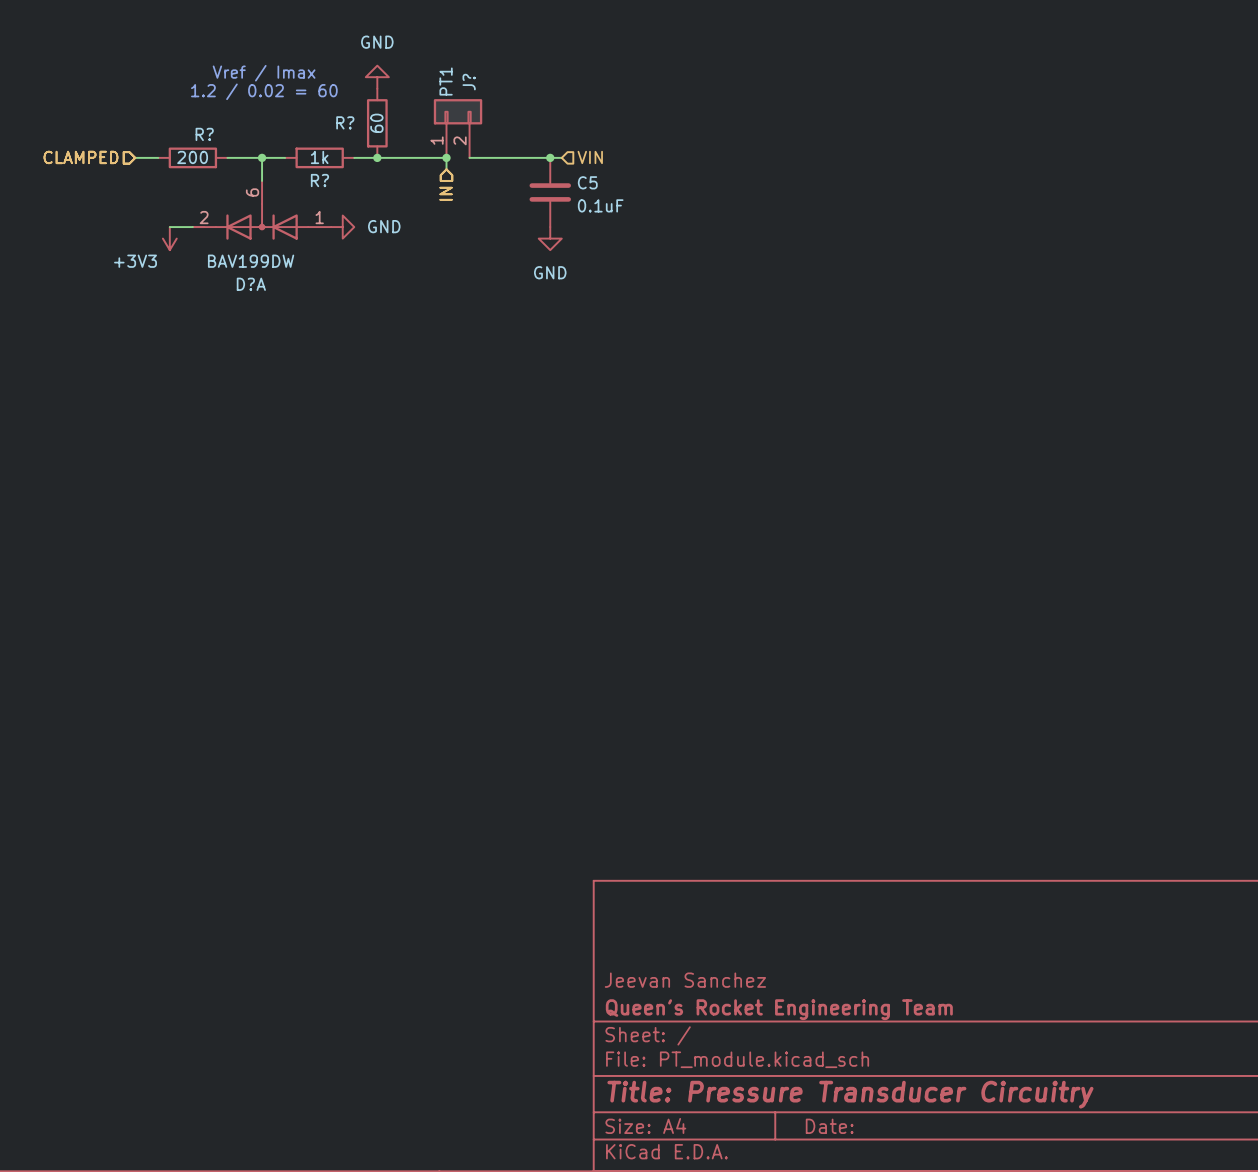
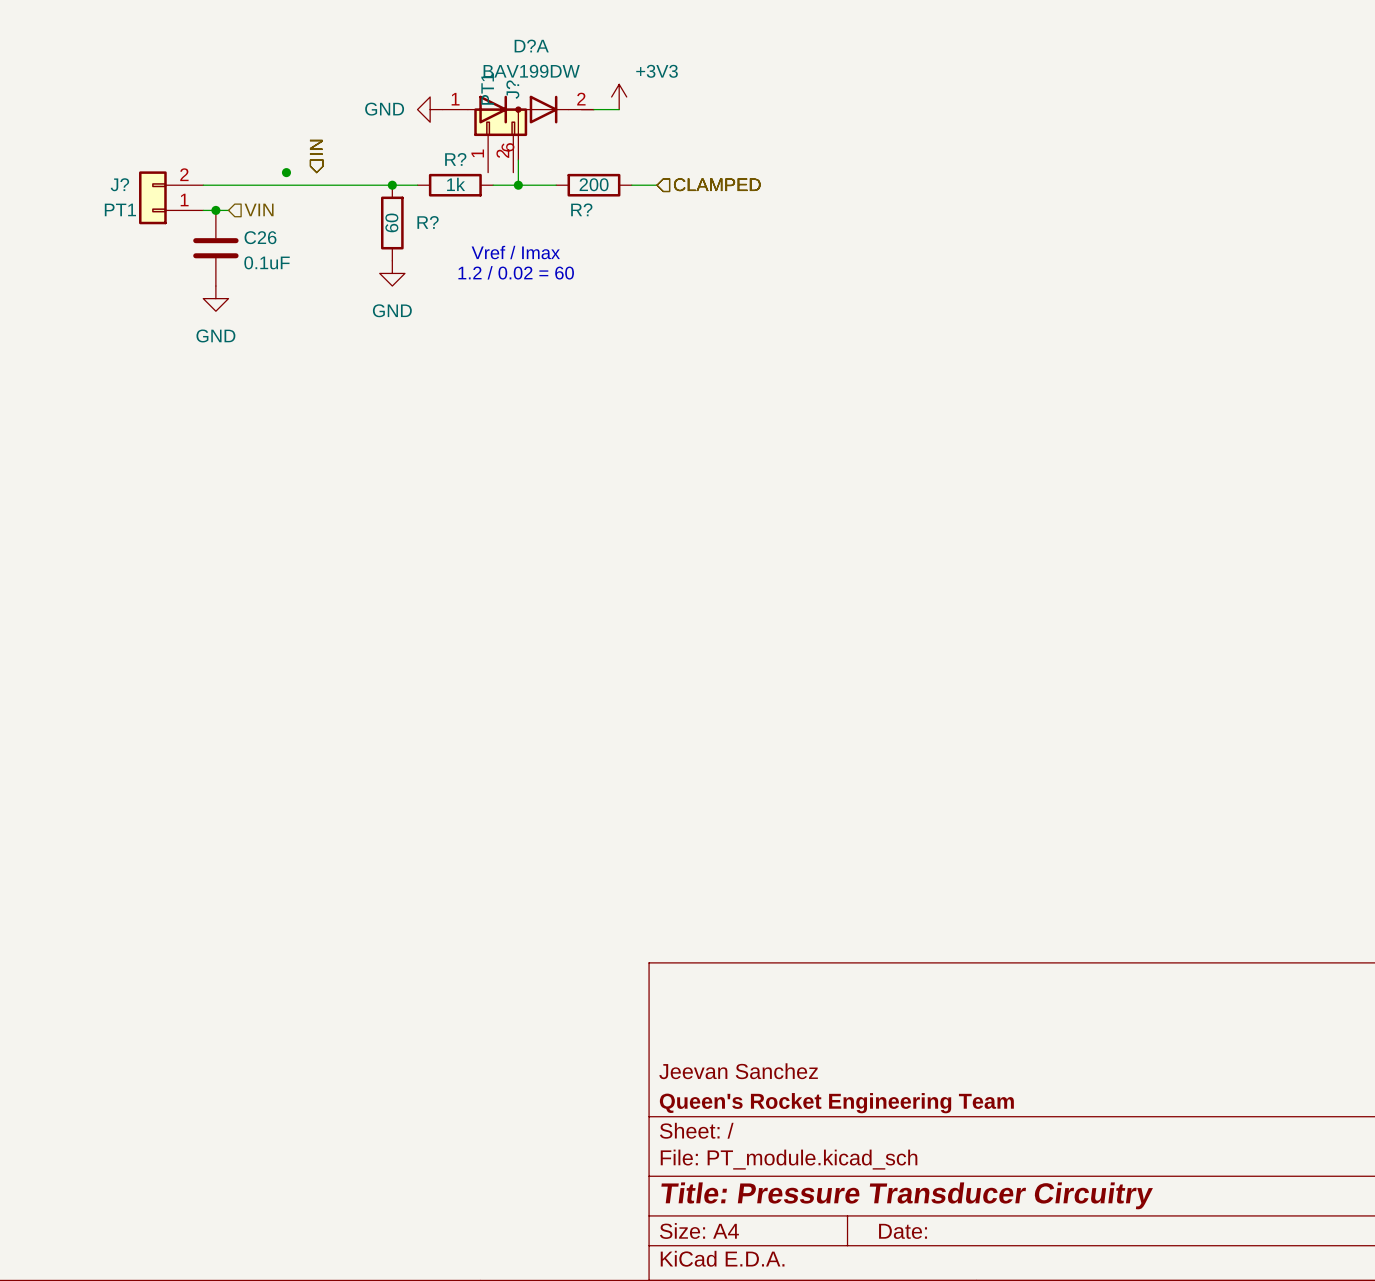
text: Vref / Imax (264, 73) -> none
power symbol rotation: 0° (377, 77) -> 90° counterclockwise (430, 109)
power symbol position: GND (377, 77) -> GND (430, 109)
power symbol: none -> +3V3 (619, 96)
text: 1.2 / 0.02 = 60 (264, 91) -> none
wire: none -> (593, 109) (619, 109)
D?A: none -> BAV199DW (518, 127)
R? name position: R? (345, 122) -> R? (428, 222)
R? position: (377, 123) -> (392, 223)
hierarchical label: CLAMPED (80, 157) -> none
R?: 200 (192, 157) -> none
wire: (227, 157) (285, 157) -> (493, 185) (556, 185)
wire: (262, 157) (262, 180) -> (518, 160) (518, 185)
R? position: (319, 157) -> (455, 185)
wire: (354, 157) (446, 157) (446, 169) -> none
junction position: (377, 157) -> (392, 185)
junction position: (446, 157) -> (518, 185)
wire: (469, 157) (561, 157) -> none
junction: (550, 157) -> none
hierarchical label: VIN (590, 157) -> none
hierarchical label: none -> CLAMPED (717, 184)
wire: none -> (203, 185) (417, 185)
R?: none -> 200 (593, 185)
wire: none -> (631, 185) (656, 185)
J?: none -> PT1 (171, 197)
R? name position: R? (319, 180) -> R? (455, 159)
junction: none -> (215, 210)
hierarchical label: none -> VIN (259, 209)
C5: 0.1uF (550, 192) -> none
hierarchical label rotation: 0° (446, 193) -> 180° (316, 147)
hierarchical label position: IN (446, 193) -> IN (316, 147)
D?A: BAV199DW (262, 210) -> none
wire: (169, 227) (192, 227) -> (203, 210) (228, 210)
C26: none -> 0.1uF (215, 248)
power symbol rotation: 0° (342, 227) -> 90° clockwise (392, 273)
power symbol position: GND (342, 227) -> GND (392, 273)
text: none -> Vref / Imax (515, 252)
power symbol: +3V3 (169, 238) -> none
power symbol: GND (550, 238) -> none
text: none -> 1.2 / 0.02 = 60 (516, 272)
power symbol: none -> GND (215, 298)

